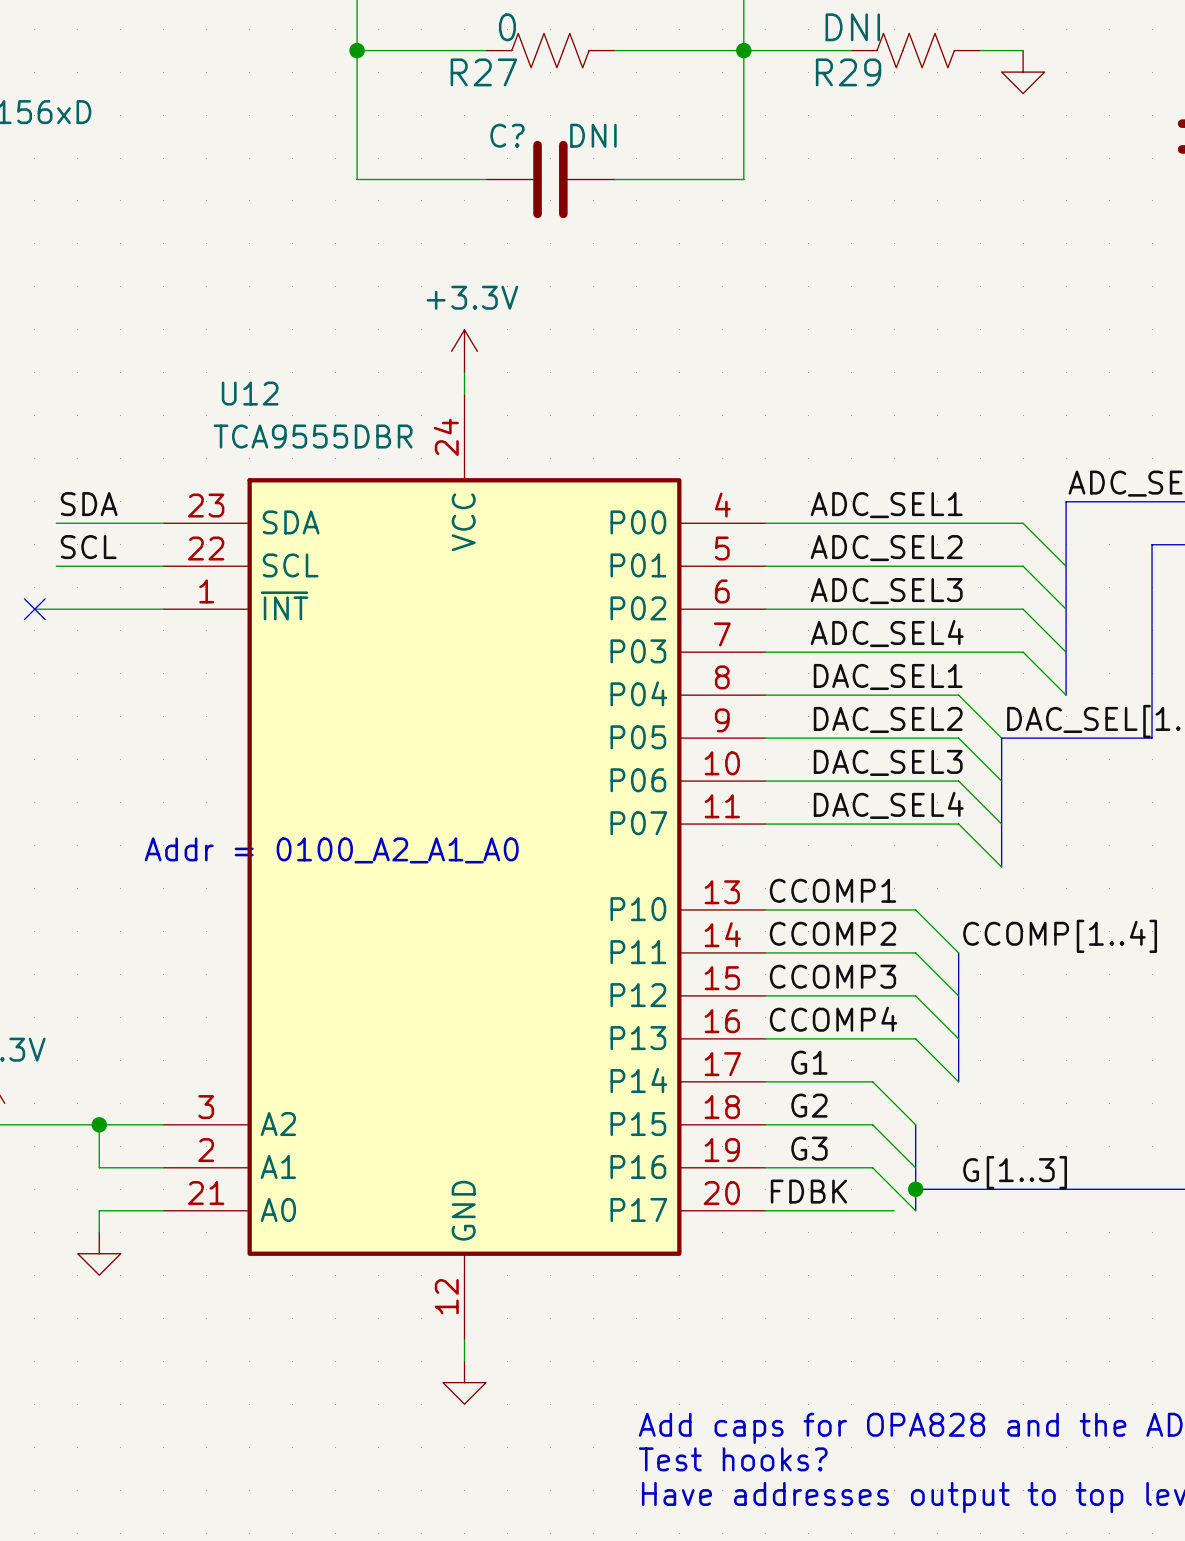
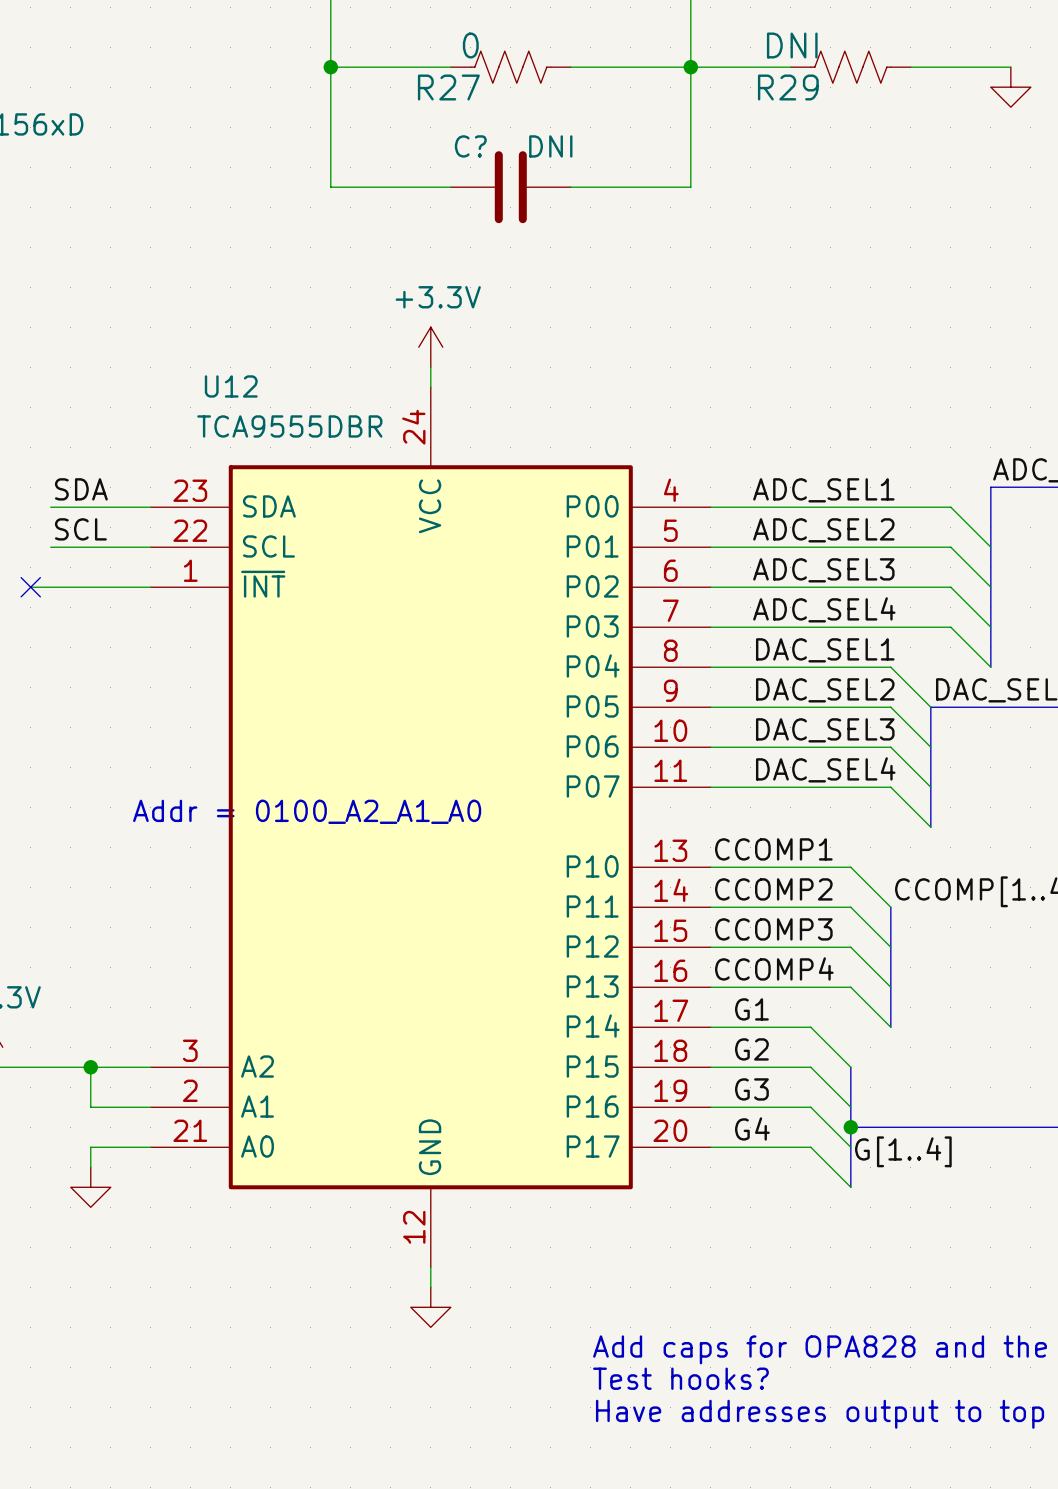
wire: none -> (950, 67) (1010, 67)
power symbol position: (1023, 72) -> (1010, 87)
label: G[1..3] (1015, 1172) -> G[1..4] (903, 1151)
label: FDBK (808, 1191) -> none
label: none -> G4 (752, 1128)
wire: (872, 1210) (894, 1210) -> (810, 1147) (850, 1187)
bus: none -> (850, 1147) (850, 1187)

